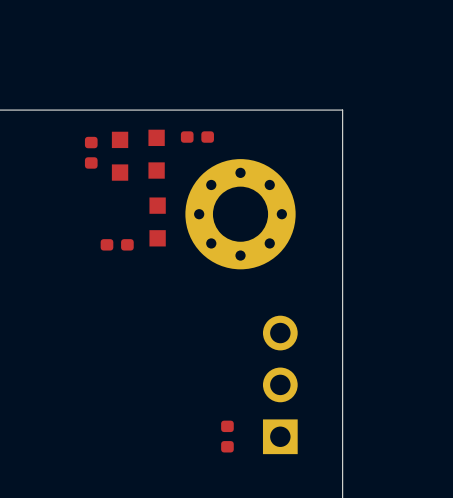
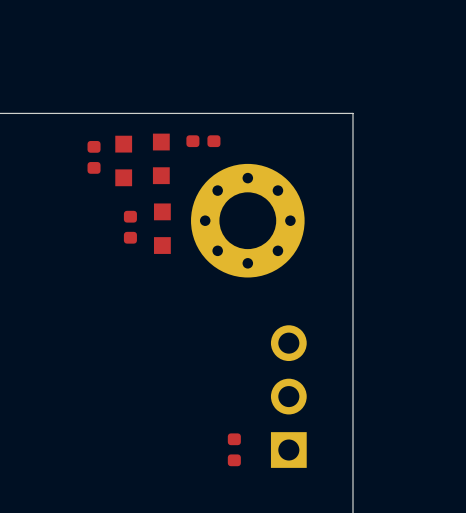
part: none -> (130, 227)
part: (117, 244) -> none

